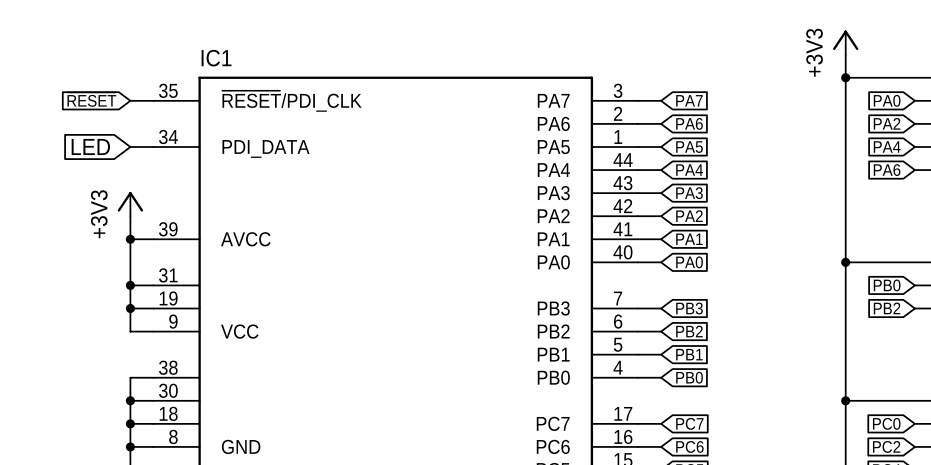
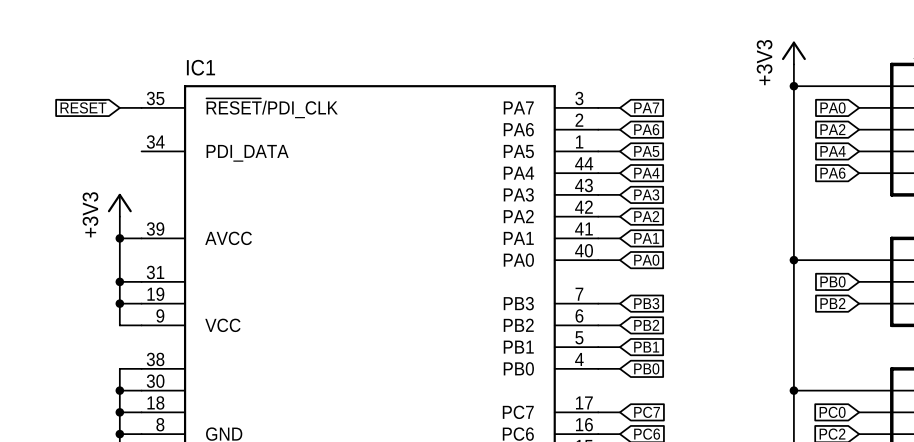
global label: LED (90, 146) -> none
wire: (130, 146) (153, 146) -> none

